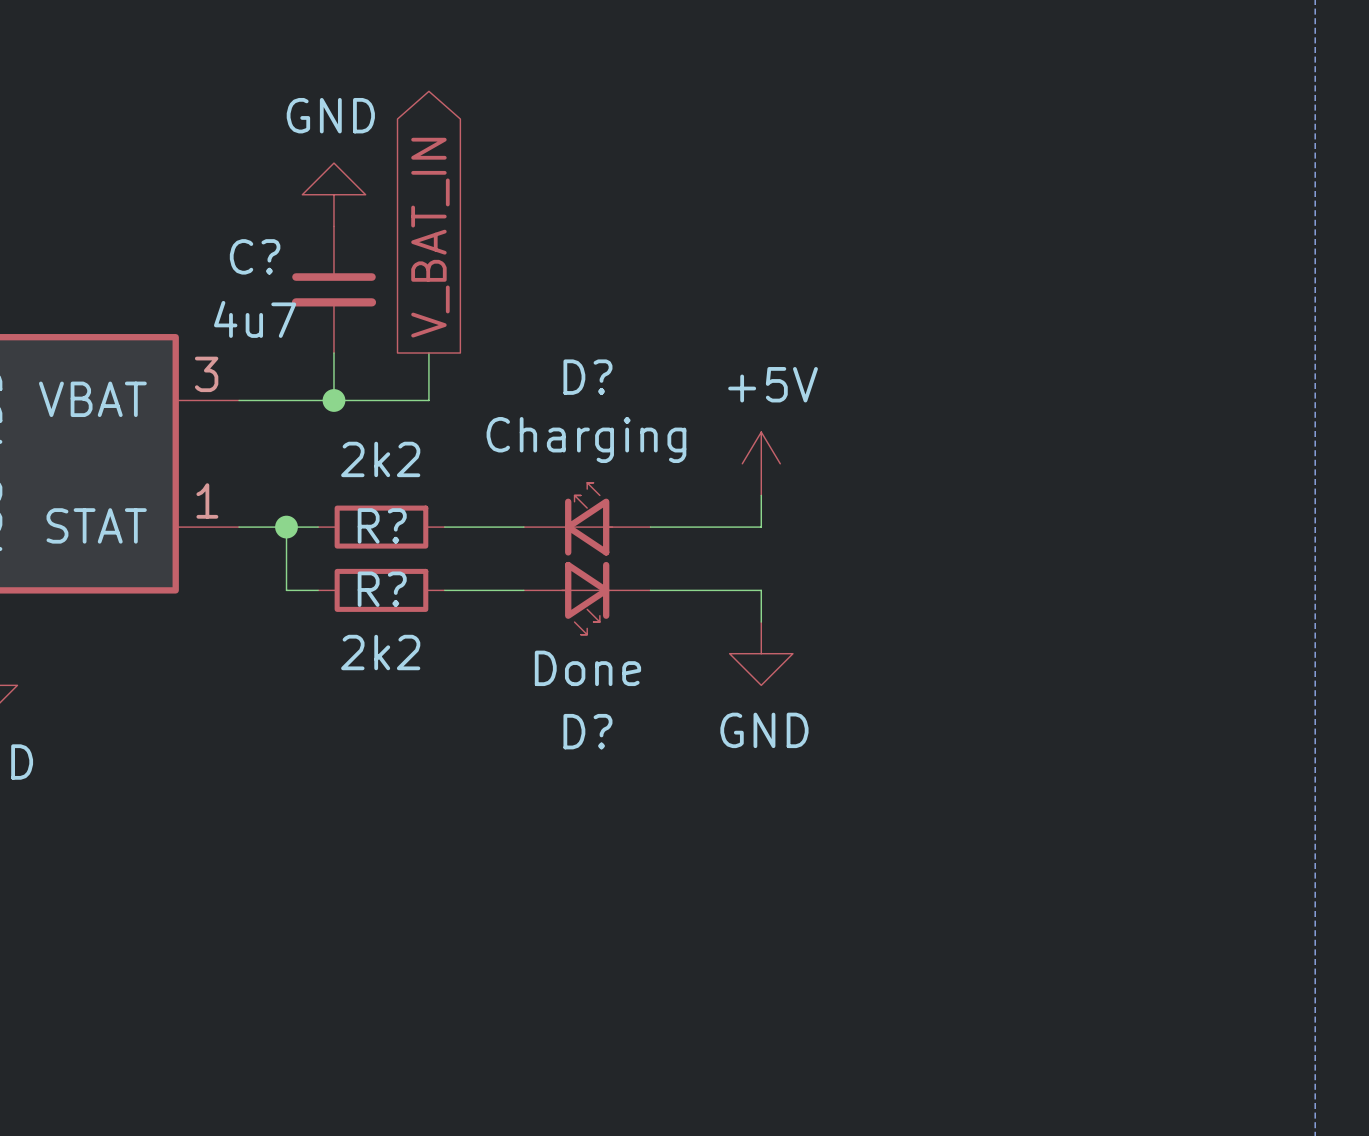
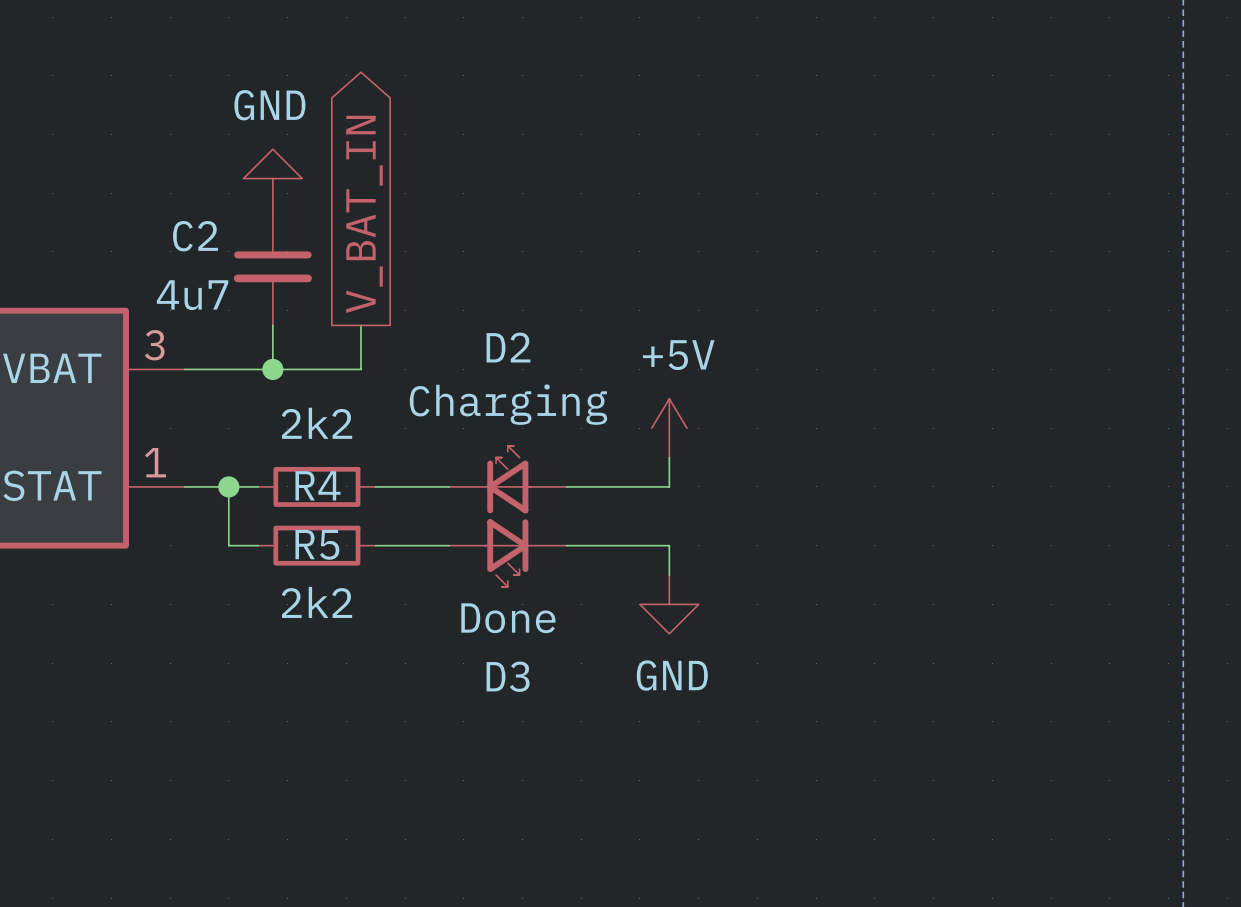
C? name: C? (255, 256) -> C2 (195, 236)
D? name: D? (587, 377) -> D2 (508, 347)
R? name: R? (382, 525) -> R4 (318, 485)
R? name: R? (382, 589) -> R5 (317, 544)
D? name: D? (587, 731) -> D3 (508, 676)

